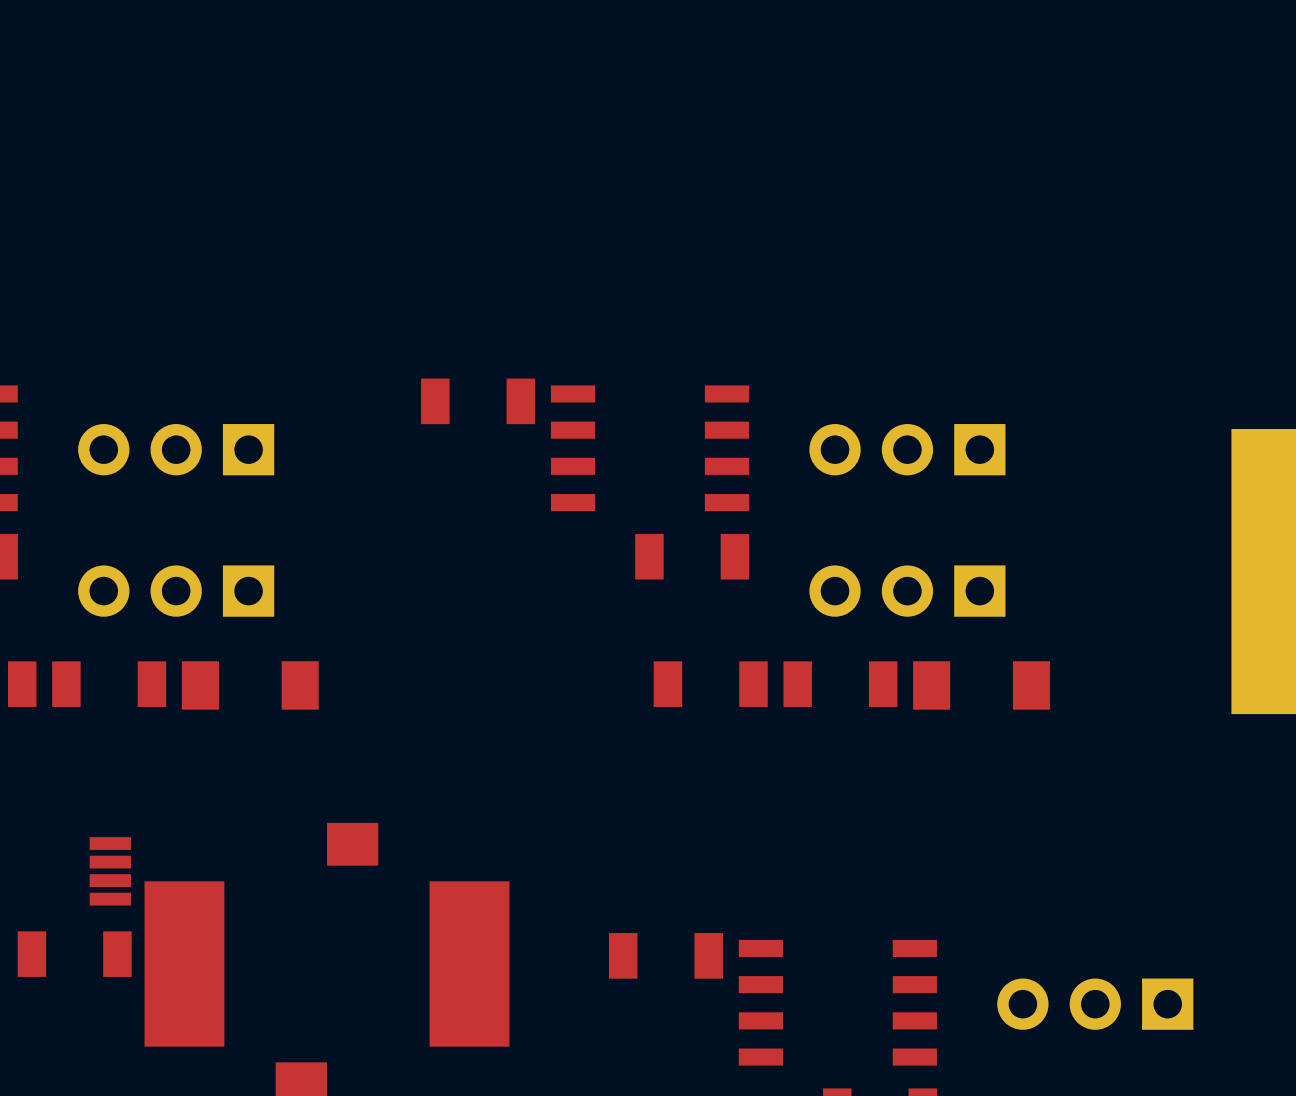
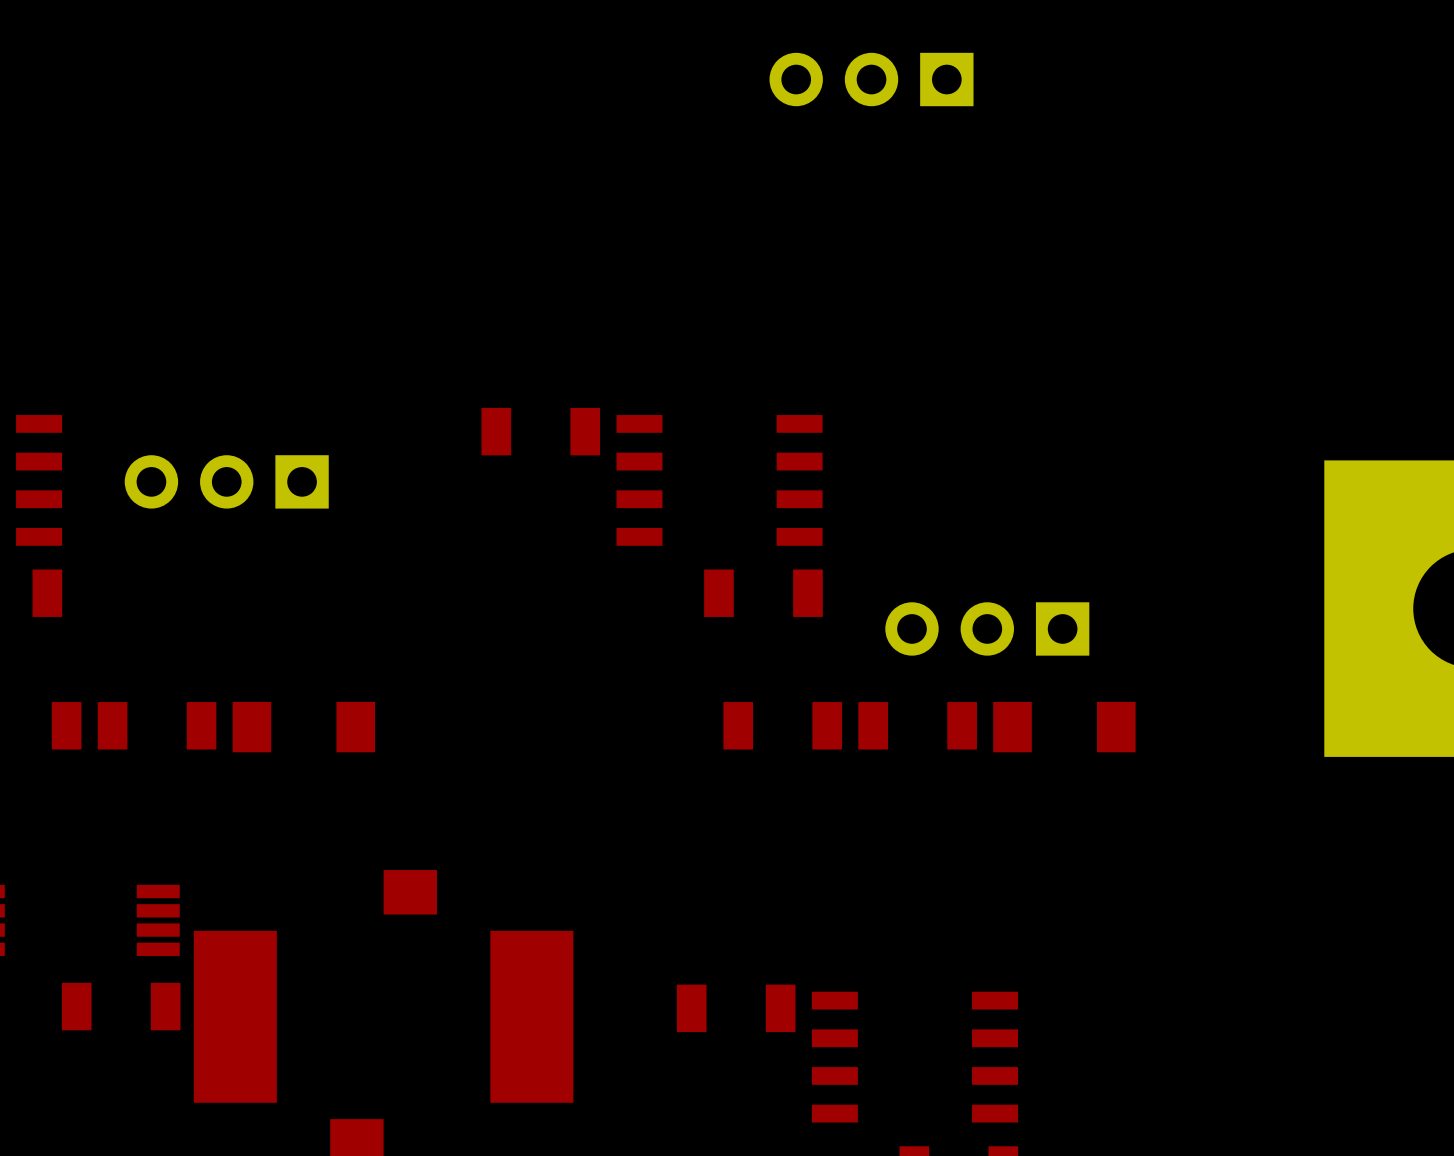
part position: (907, 449) -> (871, 79)
part: (176, 591) -> none
part: (1095, 1004) -> none

